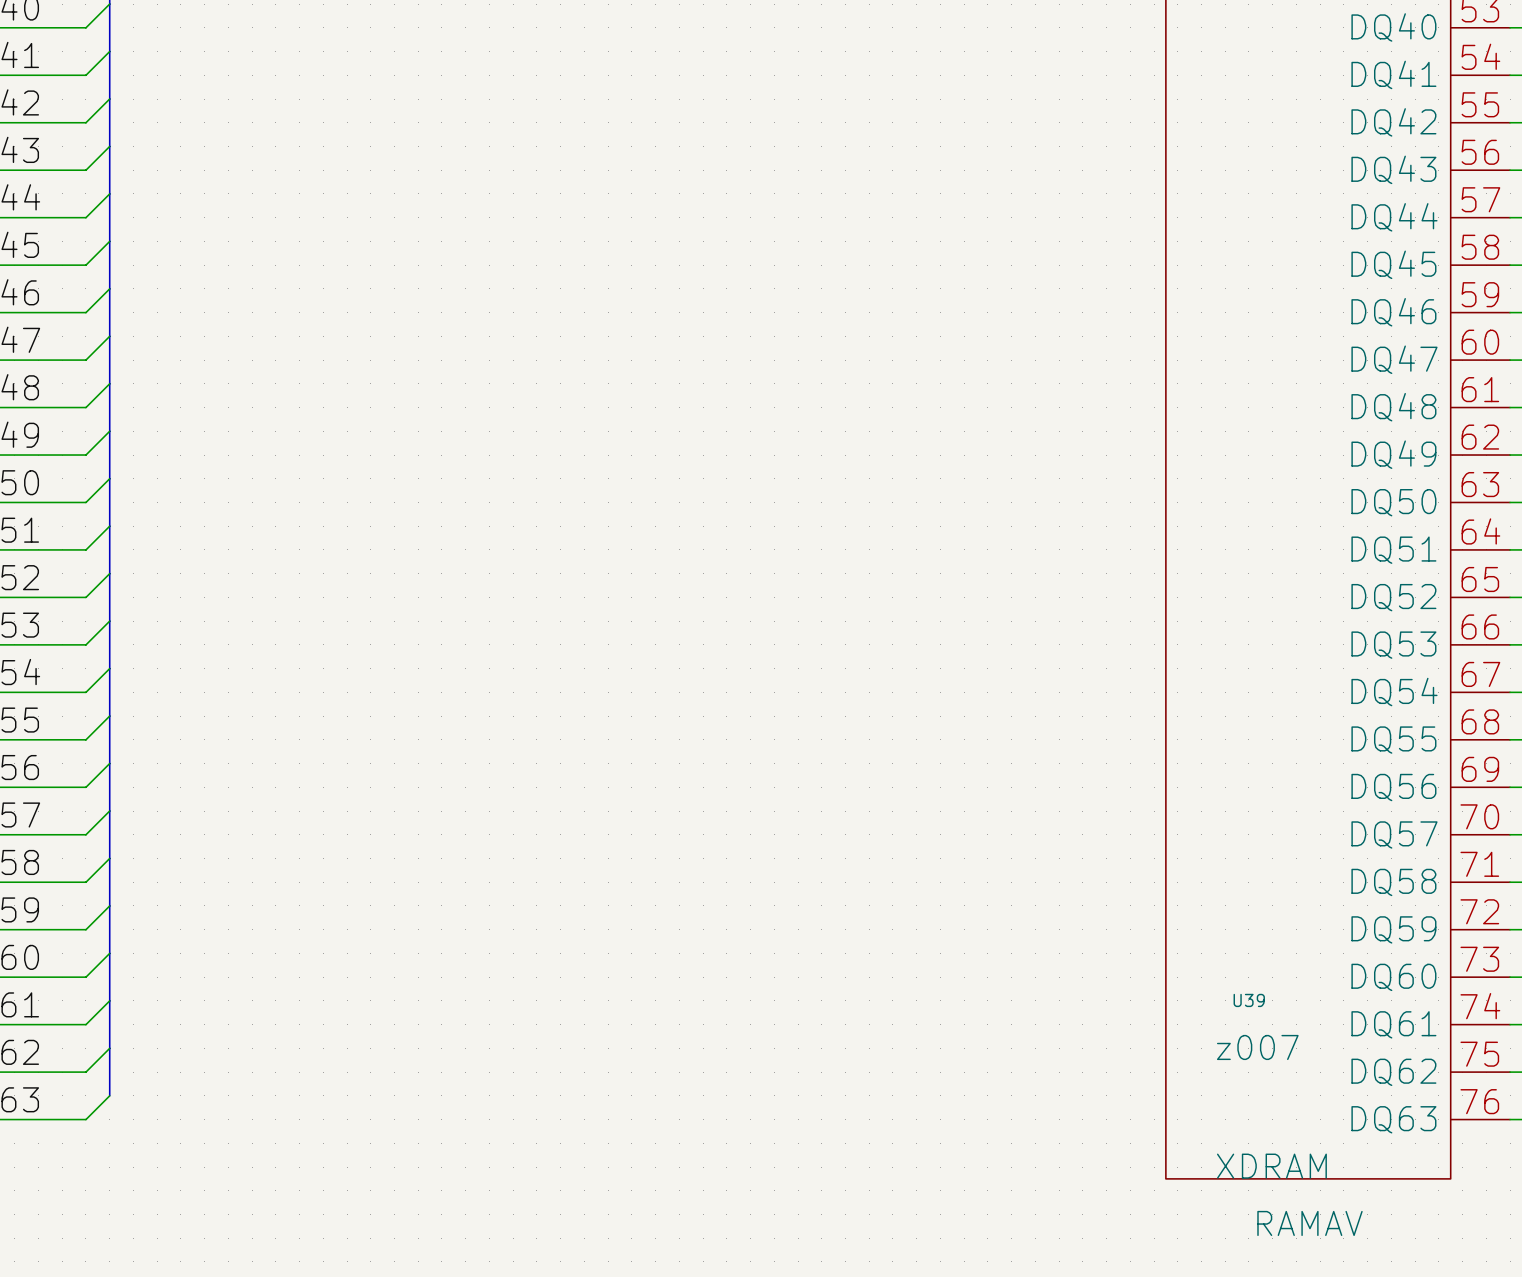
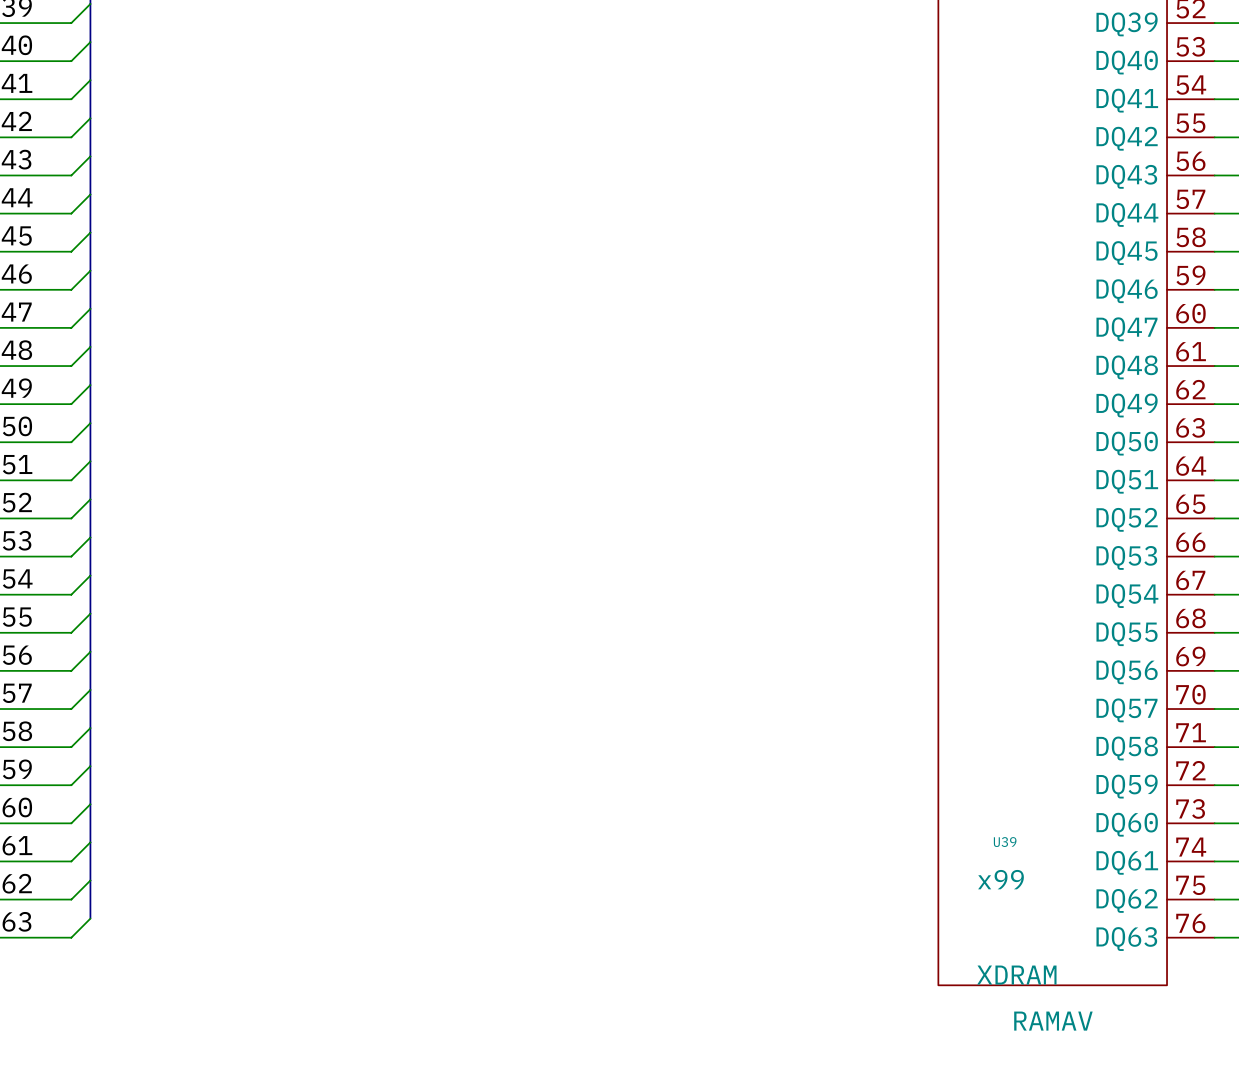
U39 text: z007 (1257, 1047) -> x99 (1001, 879)

